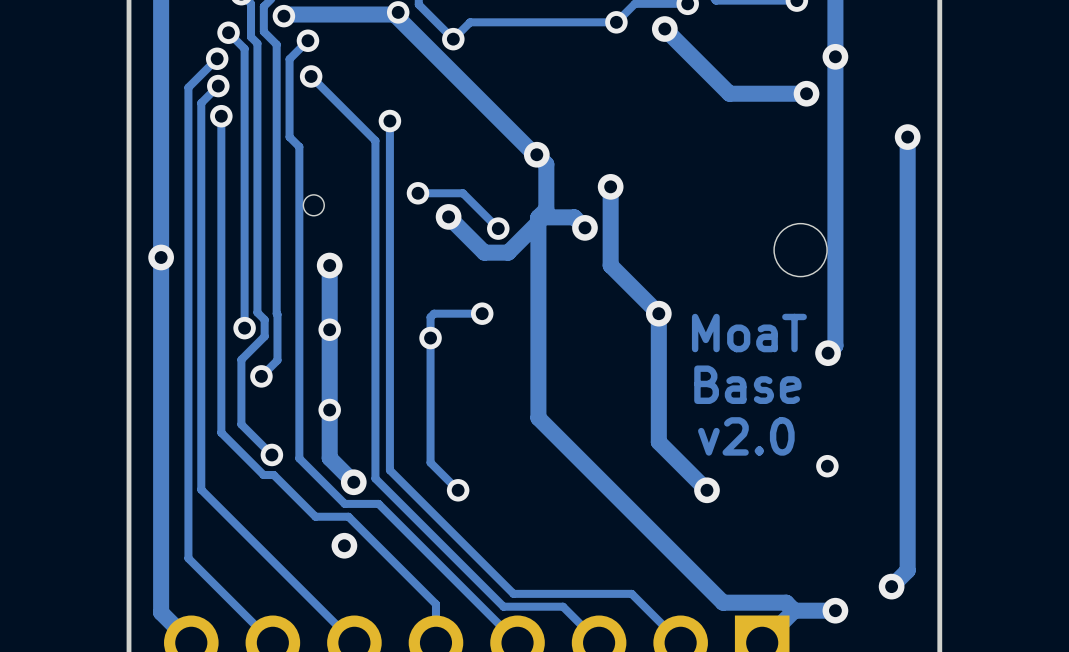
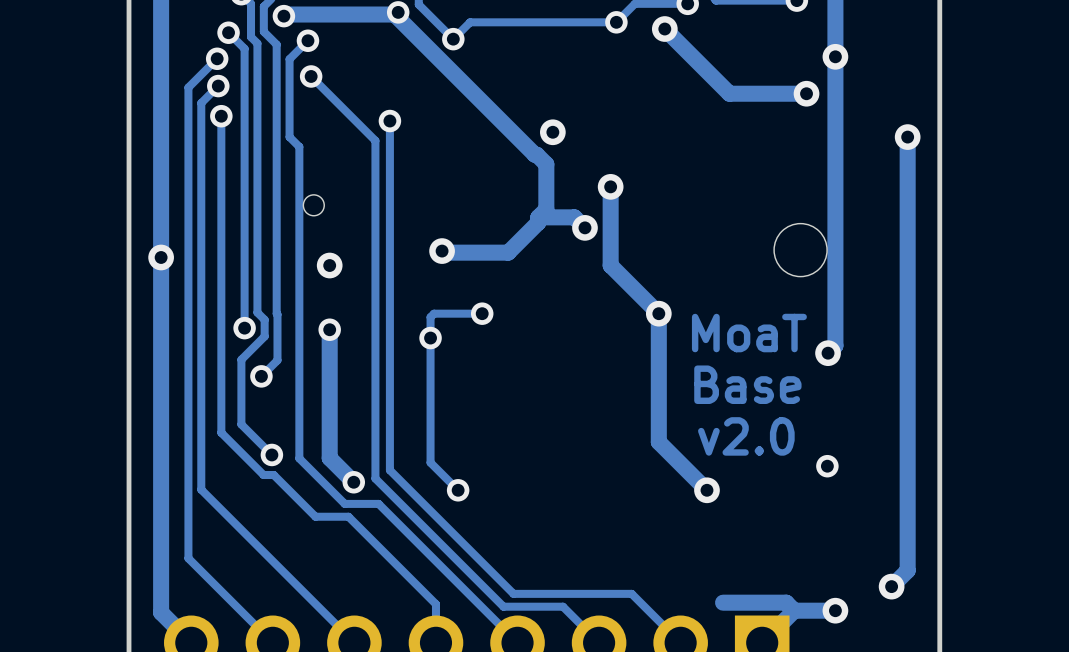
via position: (536, 154) -> (552, 132)
track: (417, 193) (462, 193) (498, 228) -> none
via: (417, 193) -> none
track: (448, 216) (484, 252) -> (442, 251) (443, 252) (484, 252)
via position: (448, 216) -> (442, 251)
track: (538, 222) (538, 418) (723, 602) -> none
via: (498, 228) -> none
track: (329, 265) (329, 329) -> none
via position: (329, 410) -> (353, 482)
via: (353, 482) -> none
via: (344, 545) -> none

